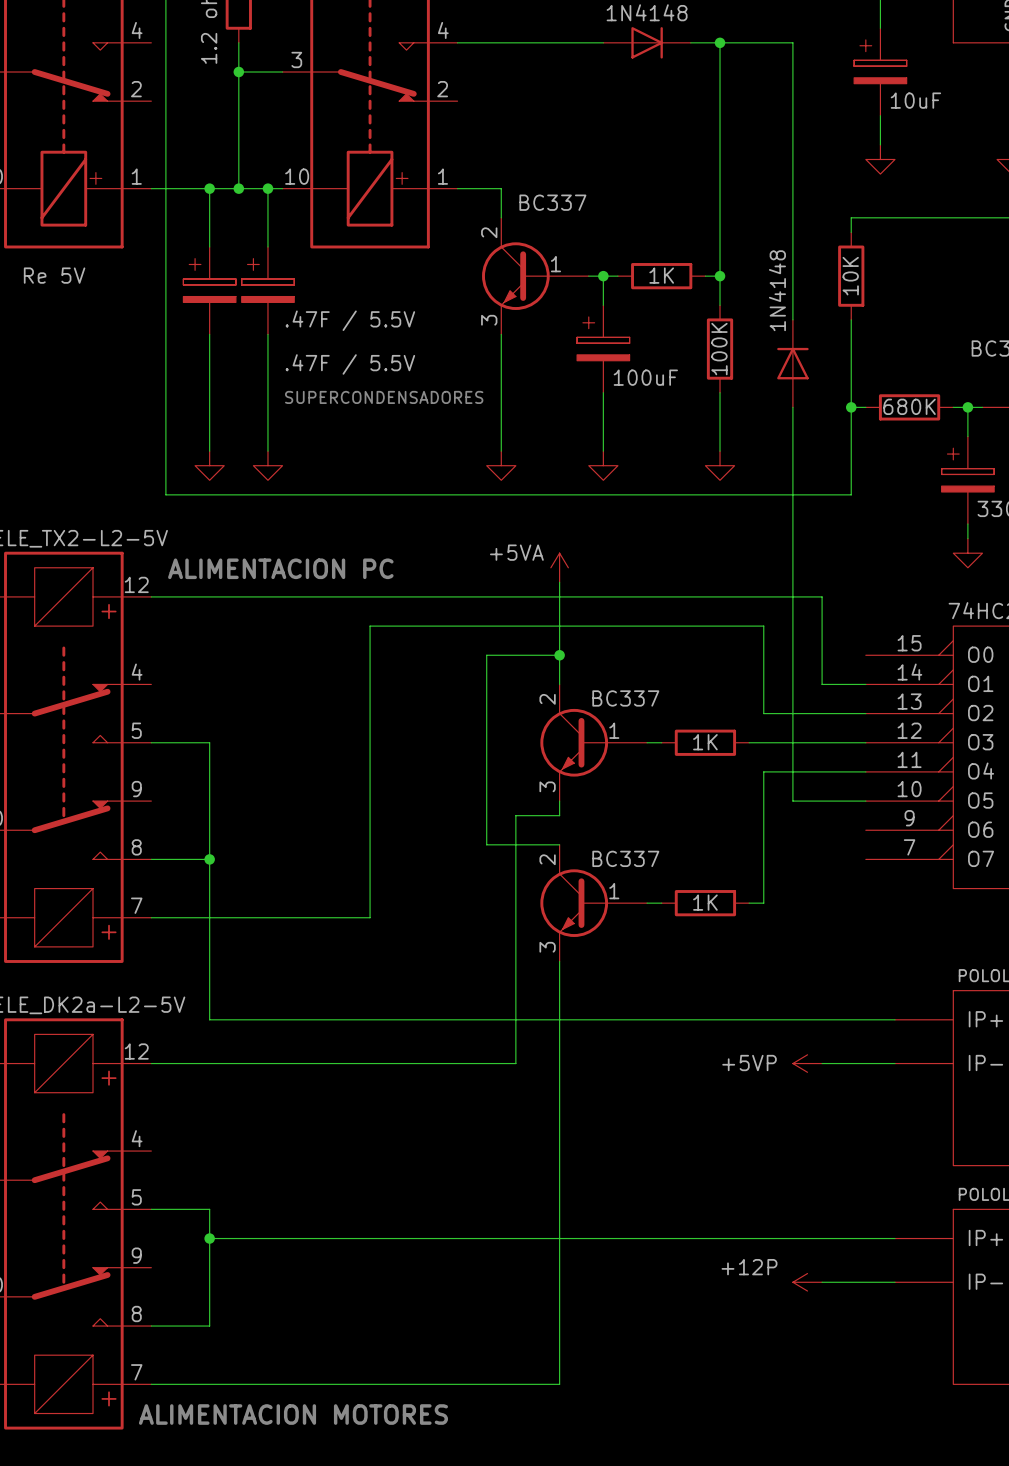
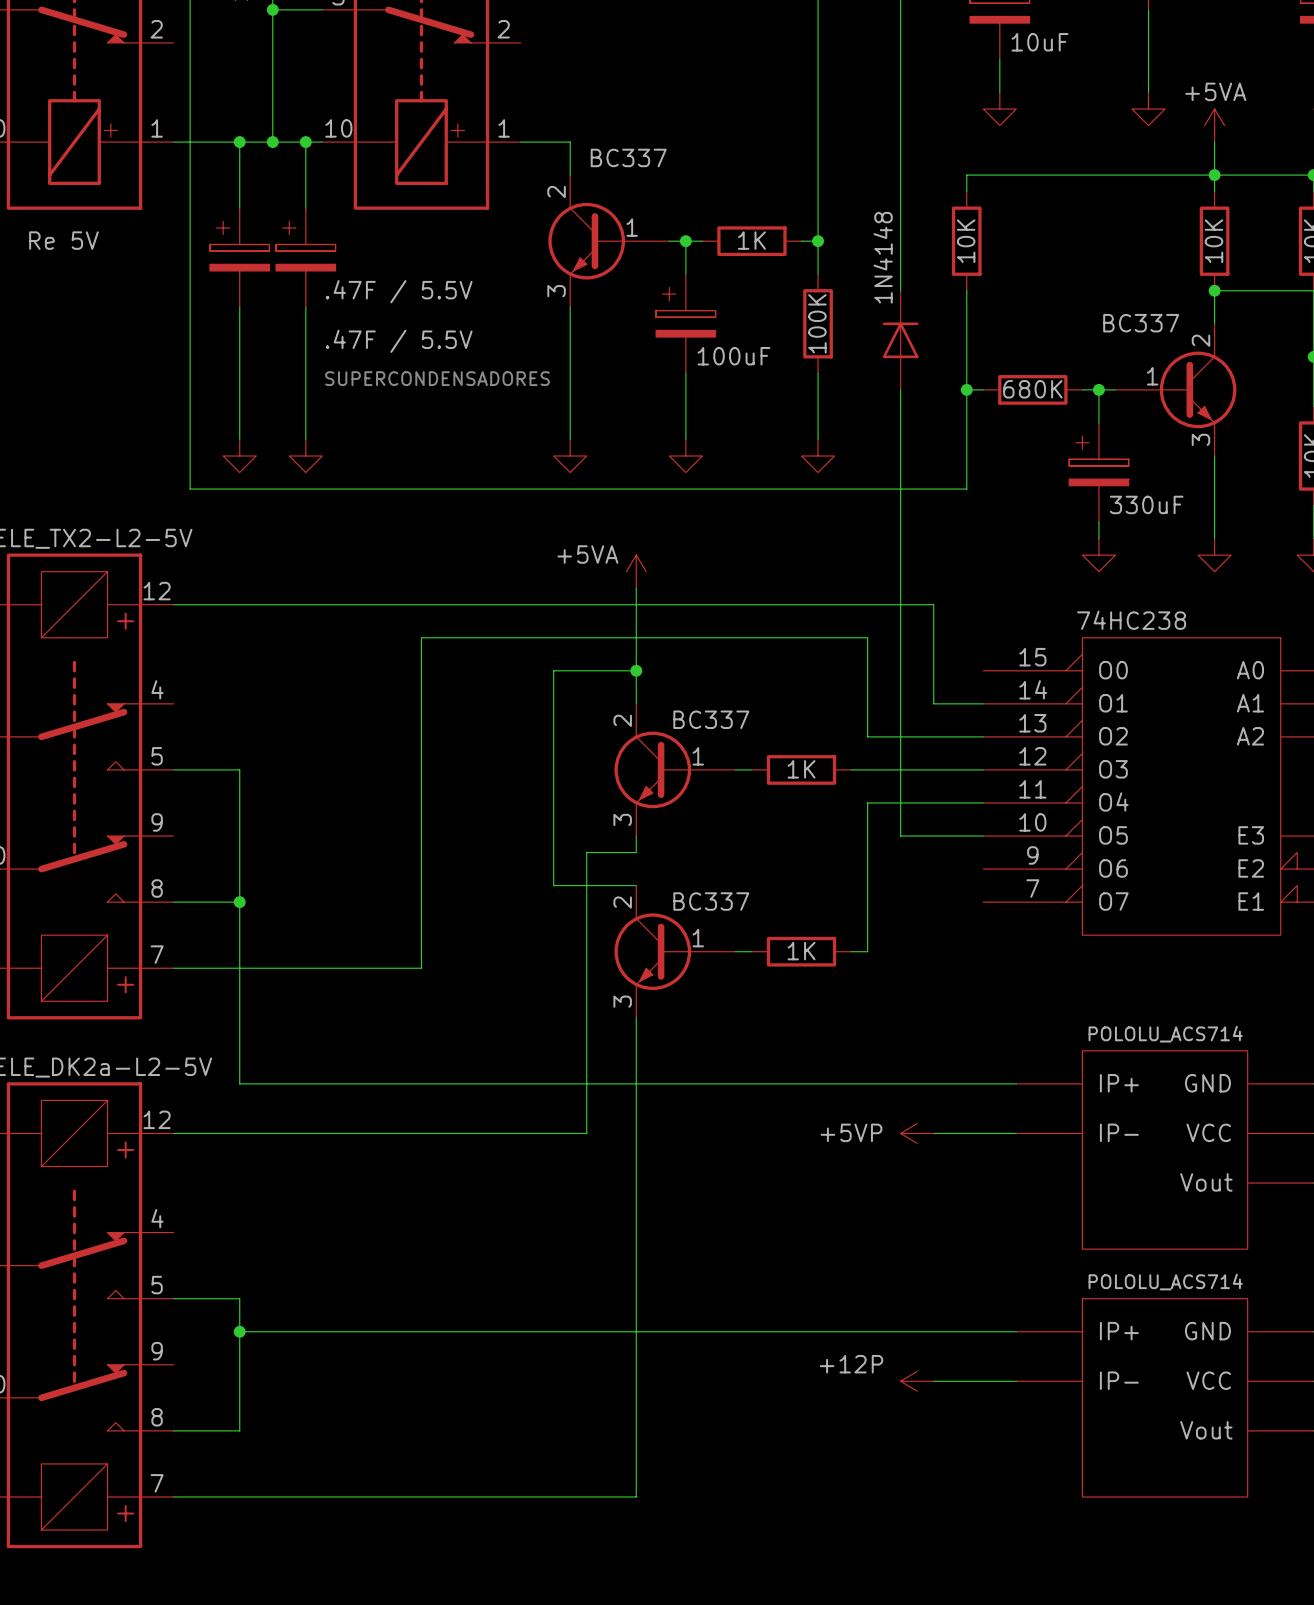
text: ALIMENTACION PC (280, 568) -> none
text: ALIMENTACION MOTORES (293, 1414) -> none

